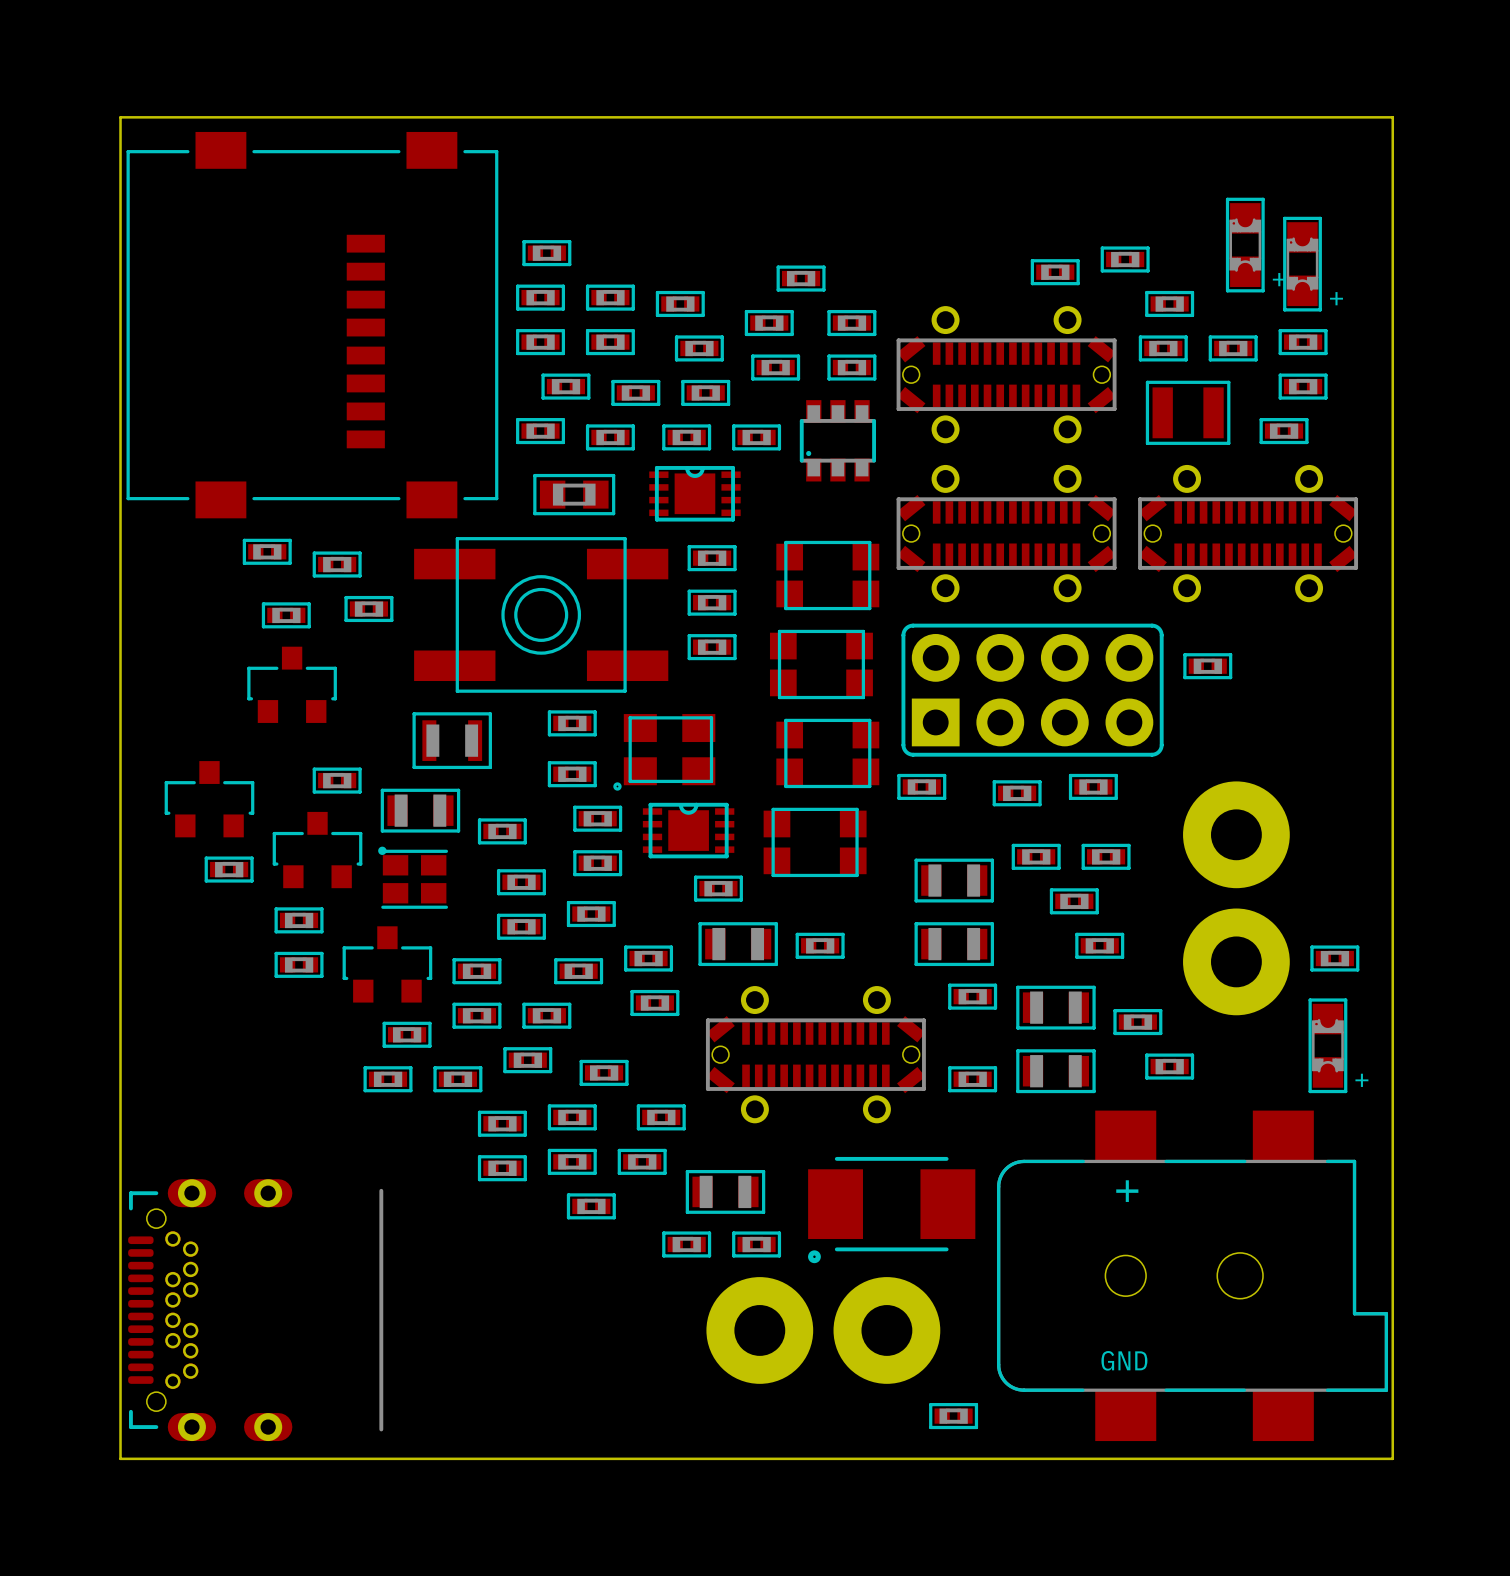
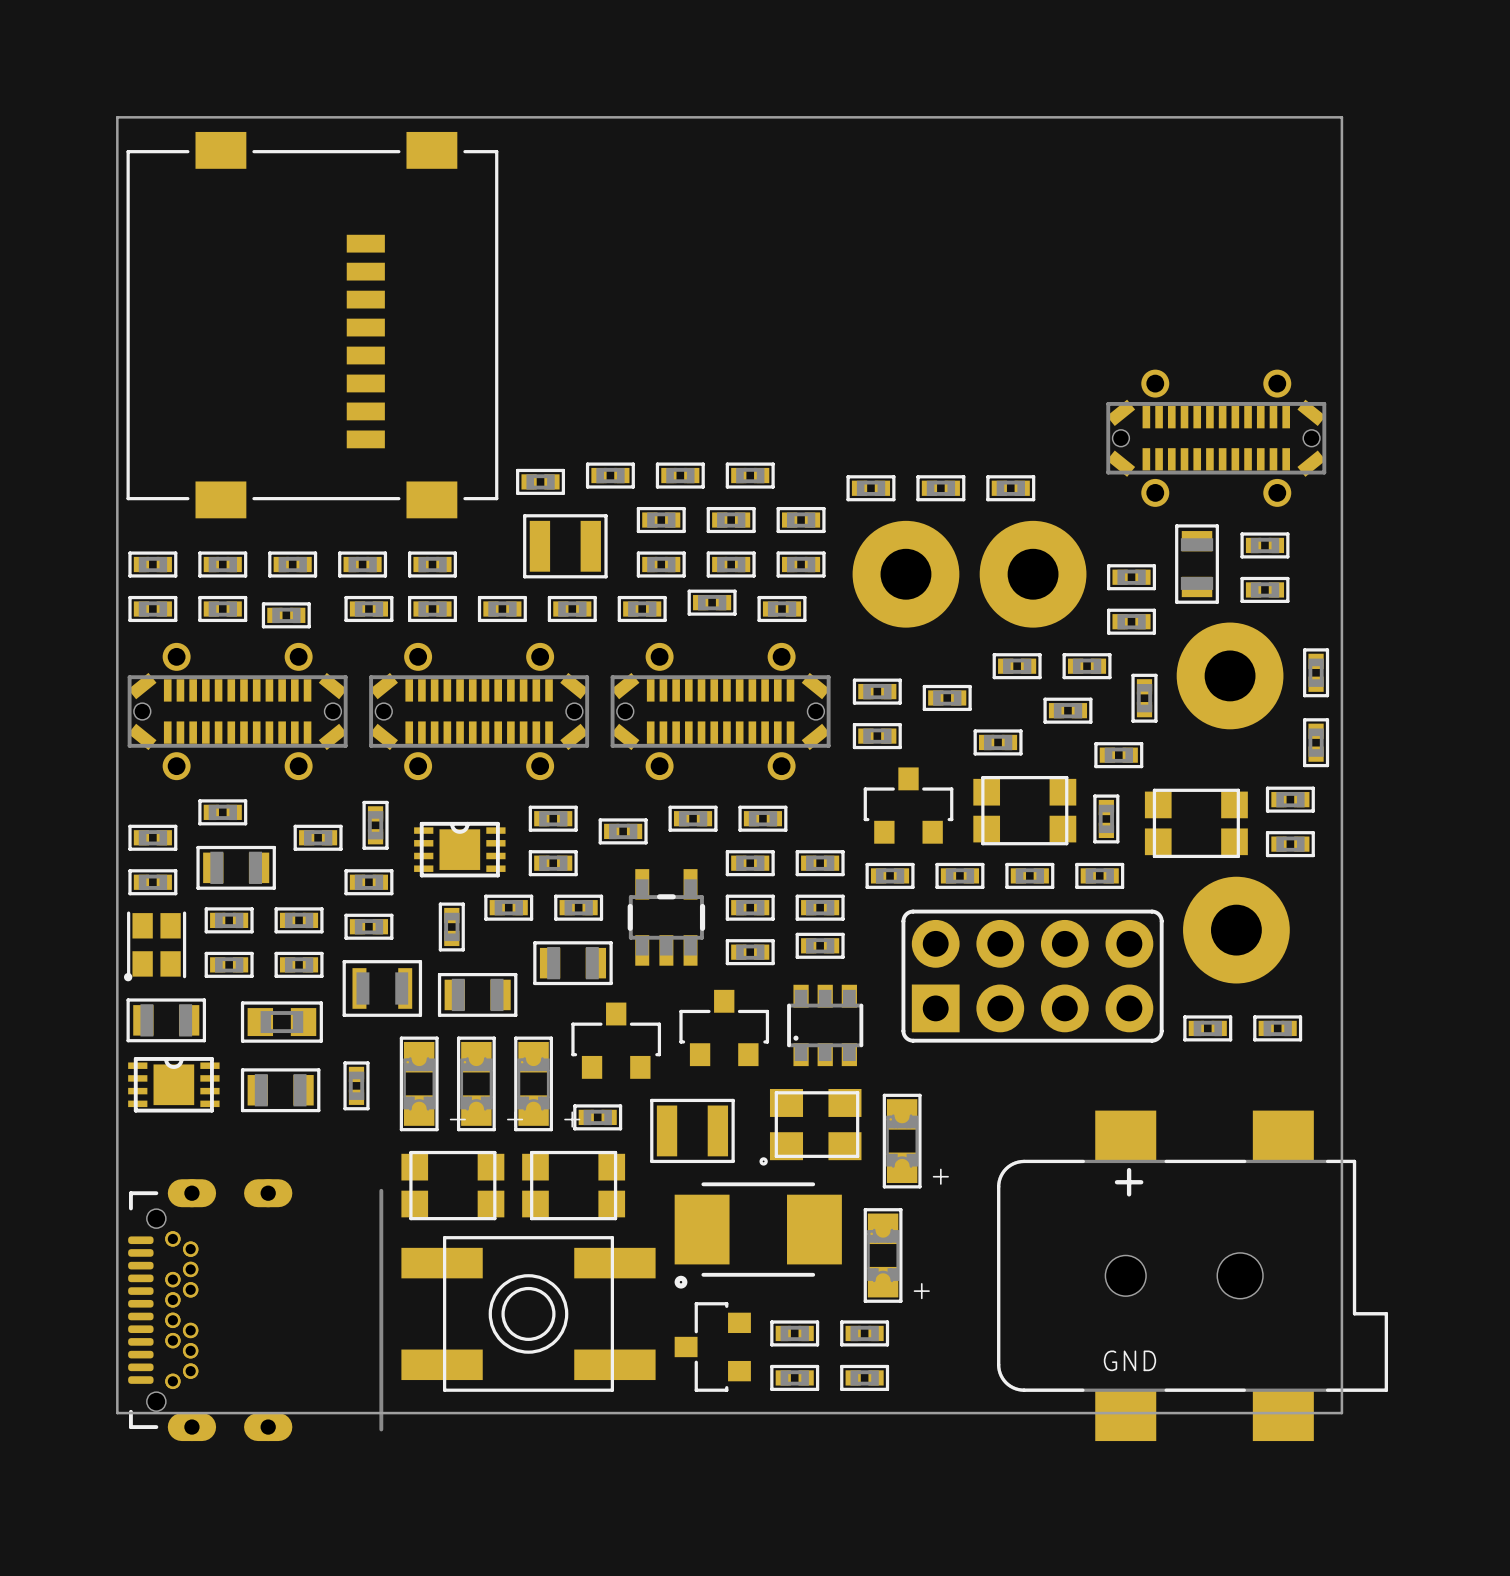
board edge: (120, 117) (120, 1458) (1392, 1458) (1392, 117) (1341, 117) -> (120, 117) (117, 117) (117, 1413) (1341, 1413) (1341, 117)
part: (1245, 245) -> none
part: (546, 253) -> none
part: (1125, 259) -> none
part: (1302, 264) -> none
part: (1055, 272) -> none
part: (801, 278) -> none
part: (540, 297) -> none
part: (610, 297) -> none
part: (680, 303) -> none
part: (1169, 303) -> none
part: (769, 323) -> none
part: (851, 323) -> none
part: (540, 342) -> none
part: (610, 342) -> none
part: (1303, 342) -> none
part: (699, 348) -> none
part: (1163, 348) -> none
part: (1233, 348) -> none
part: (775, 367) -> none
part: (851, 367) -> none
part: (1006, 374) -> none
part: (565, 386) -> none
part: (1303, 386) -> none
part: (635, 392) -> none
part: (705, 392) -> none
part: (1188, 412) -> none
part: (540, 431) -> none
part: (1284, 431) -> none
part position: (610, 437) -> (610, 475)
part: (686, 437) -> none
part: (756, 437) -> none
part: none -> (1216, 438)
part position: (837, 440) -> (825, 1025)
part footprint: [1138, 464, 1359, 603] -> [1240, 532, 1290, 559]
part: none -> (680, 475)
part: none -> (750, 475)
part: none -> (540, 481)
part: none -> (870, 488)
part: none -> (940, 488)
part: none -> (1010, 488)
part: (694, 493) -> none
part position: (574, 494) -> (281, 1022)
part: none -> (661, 520)
part: none -> (731, 520)
part: none -> (801, 520)
part: (1006, 533) -> none
part: none -> (565, 546)
part: (267, 551) -> none
part position: (712, 558) -> (731, 564)
part: none -> (152, 564)
part: none -> (222, 564)
part: none -> (292, 564)
part: (337, 564) -> none
part: none -> (362, 564)
part: none -> (432, 564)
part: none -> (661, 564)
part: none -> (801, 564)
part: none -> (1197, 564)
part: none -> (905, 574)
part: none -> (1033, 574)
part: (827, 575) -> none
part: none -> (1131, 577)
part: none -> (1264, 589)
part: none -> (152, 608)
part: none -> (222, 608)
part: none -> (432, 608)
part: none -> (502, 608)
part: none -> (572, 608)
part: none -> (642, 608)
part: none -> (782, 608)
part: (541, 614) -> none
part: none -> (1131, 621)
part: (712, 647) -> none
part footprint: [1183, 653, 1233, 680] -> [1176, 622, 1284, 730]
part: (821, 664) -> none
part: none -> (1017, 666)
part: none -> (1087, 666)
part: none -> (1316, 672)
part: (292, 684) -> none
part position: (1032, 690) -> (1032, 976)
part: none -> (877, 691)
part: none -> (947, 697)
part: none -> (1144, 698)
part: none -> (1067, 710)
part: none -> (237, 711)
part: none -> (479, 711)
part: none -> (720, 711)
part: (572, 723) -> none
part: none -> (877, 736)
part position: (452, 740) -> (382, 988)
part: none -> (998, 742)
part: none -> (1316, 742)
part position: (664, 752) -> (810, 1127)
part: (827, 753) -> none
part: none -> (1118, 755)
part footprint: [164, 761, 255, 838] -> [198, 799, 248, 826]
part footprint: [897, 773, 947, 800] -> [863, 767, 954, 844]
part: (572, 774) -> none
part: (337, 780) -> none
part footprint: [992, 780, 1042, 807] -> [973, 775, 1077, 846]
part: (1093, 786) -> none
part: none -> (1290, 799)
part footprint: [642, 802, 735, 859] -> [668, 805, 718, 832]
part footprint: [763, 807, 867, 878] -> [795, 850, 845, 877]
part: (420, 810) -> none
part footprint: [272, 811, 363, 889] -> [293, 824, 343, 851]
part: none -> (553, 818)
part: (597, 818) -> none
part: none -> (762, 818)
part: none -> (1106, 818)
part: none -> (1196, 823)
part: none -> (375, 825)
part: (502, 831) -> none
part: none -> (623, 831)
part: (1236, 834) -> none
part: none -> (152, 837)
part: none -> (1290, 844)
part: none -> (459, 849)
part footprint: [204, 856, 254, 883] -> [196, 845, 276, 890]
part position: (1036, 856) -> (1029, 875)
part: (1106, 856) -> none
part footprint: [914, 858, 995, 903] -> [935, 862, 985, 889]
part: none -> (553, 863)
part: (597, 863) -> none
part: none -> (750, 863)
part: none -> (890, 875)
part: none -> (1099, 875)
part rotation: 0° (413, 877) -> 90° counterclockwise (155, 946)
part position: (413, 877) -> (155, 946)
part: none -> (152, 882)
part: none -> (368, 882)
part: (521, 882) -> none
part: (718, 888) -> none
part: (1074, 901) -> none
part: none -> (508, 907)
part: none -> (750, 907)
part: none -> (820, 907)
part position: (591, 914) -> (578, 907)
part: none -> (666, 917)
part: none -> (229, 920)
part footprint: [698, 922, 778, 967] -> [725, 939, 775, 966]
part: none -> (368, 926)
part: none -> (451, 926)
part: (521, 926) -> none
part: (954, 944) -> none
part: (1099, 945) -> none
part footprint: [554, 958, 604, 985] -> [533, 941, 613, 986]
part: (648, 958) -> none
part: (1334, 958) -> none
part position: (1236, 961) -> (1236, 930)
part: none -> (229, 964)
part: (387, 964) -> none
part: (476, 971) -> none
part: none -> (477, 994)
part: (972, 996) -> none
part: (654, 1002) -> none
part: (1055, 1007) -> none
part: (476, 1015) -> none
part: (546, 1015) -> none
part: none -> (166, 1020)
part: (1137, 1022) -> none
part: none -> (724, 1027)
part: none -> (1207, 1028)
part: none -> (1277, 1028)
part: (407, 1034) -> none
part: none -> (616, 1040)
part: (1327, 1045) -> none
part footprint: [503, 1047, 553, 1074] -> [514, 1036, 553, 1132]
part: (815, 1054) -> none
part footprint: [433, 1066, 483, 1093] -> [456, 1036, 496, 1132]
part: (1169, 1066) -> none
part: (1055, 1071) -> none
part: (604, 1072) -> none
part rotation: 0° (388, 1079) -> 90° clockwise (356, 1085)
part position: (388, 1079) -> (356, 1085)
part: (972, 1079) -> none
part: none -> (419, 1083)
part: none -> (173, 1084)
part: none -> (280, 1090)
part: (572, 1117) -> none
part: none -> (597, 1117)
part: (661, 1117) -> none
part: (502, 1123) -> none
part: none -> (692, 1130)
part: none -> (902, 1141)
part: (572, 1161) -> none
part: (642, 1161) -> none
part: (502, 1168) -> none
part: none -> (452, 1185)
part: none -> (573, 1185)
part: (725, 1191) -> none
part: (591, 1206) -> none
part: (891, 1210) -> none
part footprint: [732, 1231, 782, 1258] -> [674, 1182, 842, 1289]
part: (686, 1244) -> none
part: none -> (883, 1255)
part footprint: [833, 1277, 941, 1384] -> [840, 1320, 890, 1347]
part: none -> (528, 1313)
part: (759, 1330) -> none
part: none -> (794, 1333)
part: none -> (712, 1346)
part: none -> (794, 1377)
part: none -> (864, 1377)
part: (953, 1416) -> none

